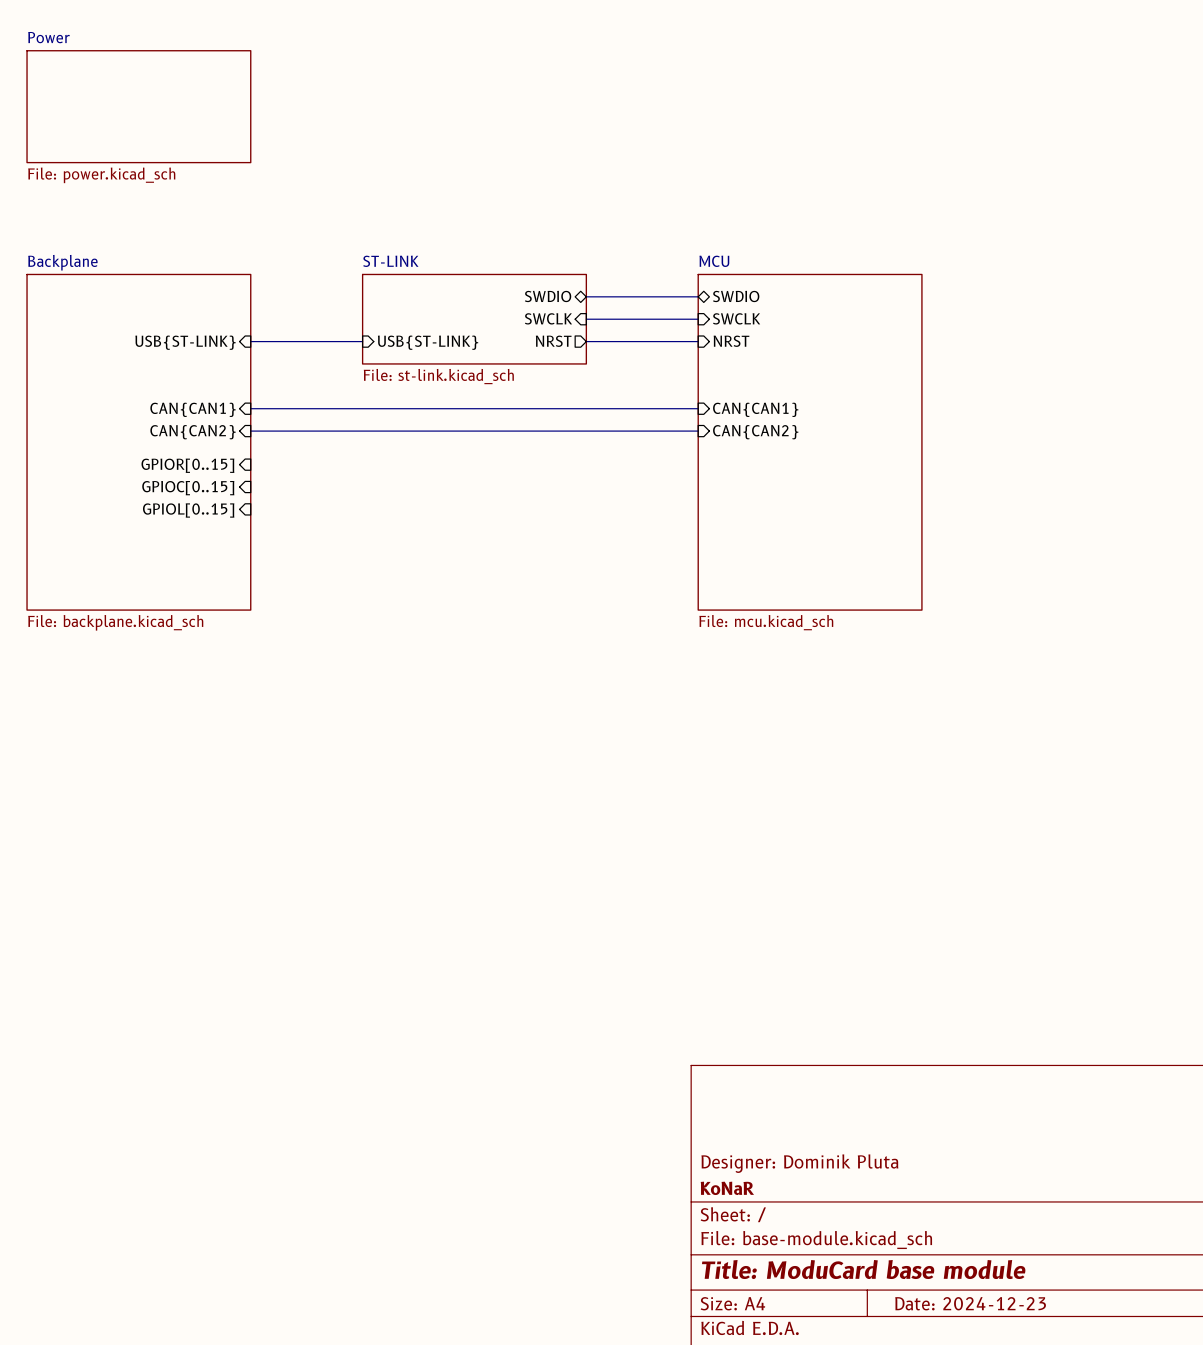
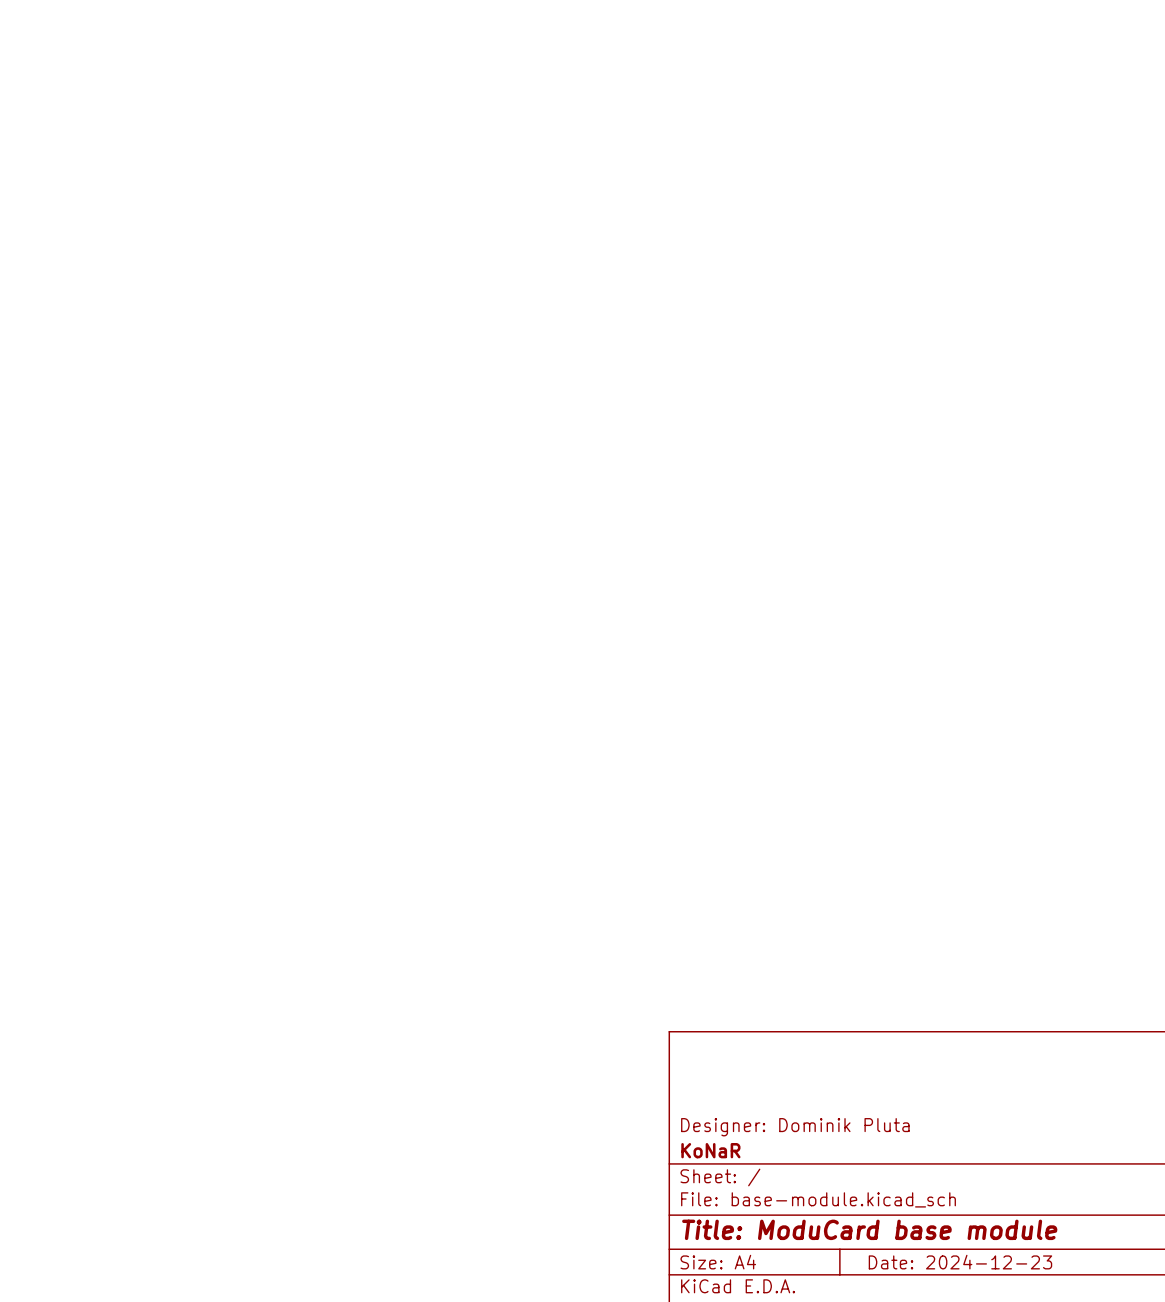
sheet Power: File: power.kicad_sch (138, 106) -> none
sheet pin: SWDIO (548, 296) -> none
wire: (586, 296) (698, 296) -> none
sheet pin: SWDIO (736, 296) -> none
sheet pin: SWCLK (548, 318) -> none
sheet pin: SWCLK (736, 318) -> none
sheet ST-LINK: File: st-link.kicad_sch (474, 319) -> none
wire: (586, 319) (698, 319) -> none
bus: (250, 341) (362, 341) -> none
sheet pin: NRST (553, 341) -> none
wire: (586, 341) (698, 341) -> none
sheet pin: NRST (731, 341) -> none
sheet pin: USB{ST-LINK} (185, 342) -> none
sheet pin: USB{ST-LINK} (428, 342) -> none
bus: (250, 408) (698, 408) -> none
sheet pin: CAN{CAN1} (192, 409) -> none
sheet pin: CAN{CAN1} (755, 409) -> none
bus: (250, 431) (698, 431) -> none
sheet pin: CAN{CAN2} (192, 432) -> none
sheet pin: CAN{CAN2} (755, 432) -> none
sheet Backplane: File: backplane.kicad_sch (138, 442) -> none
sheet MCU: File: mcu.kicad_sch (810, 442) -> none
sheet pin: GPIOR[0..15] (187, 465) -> none
sheet pin: GPIOC[0..15] (188, 488) -> none
sheet pin: GPIOL[0..15] (188, 510) -> none

